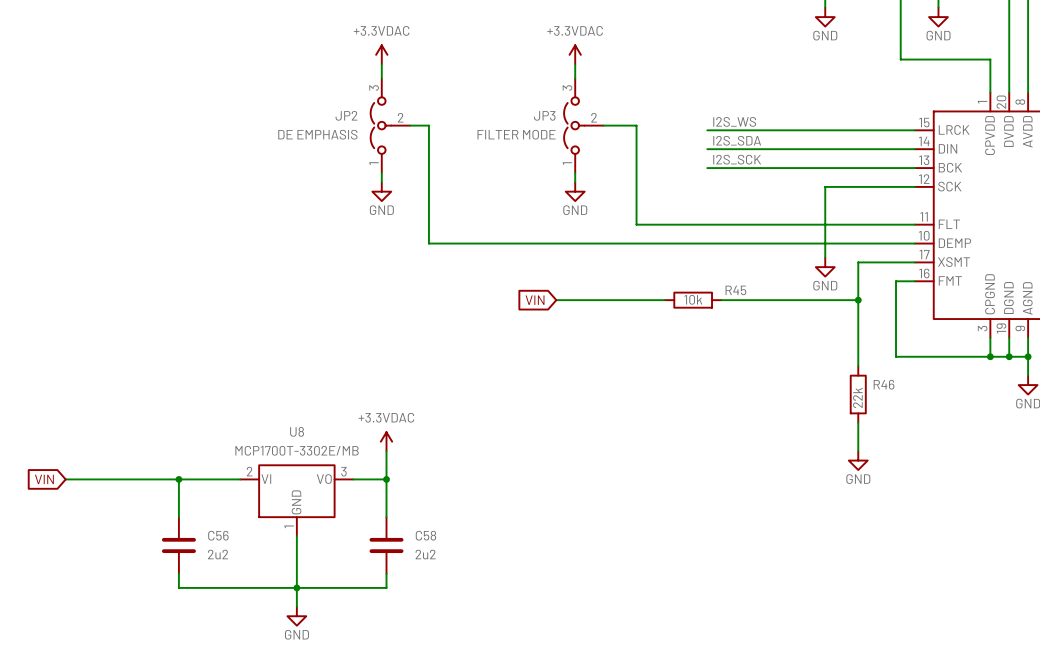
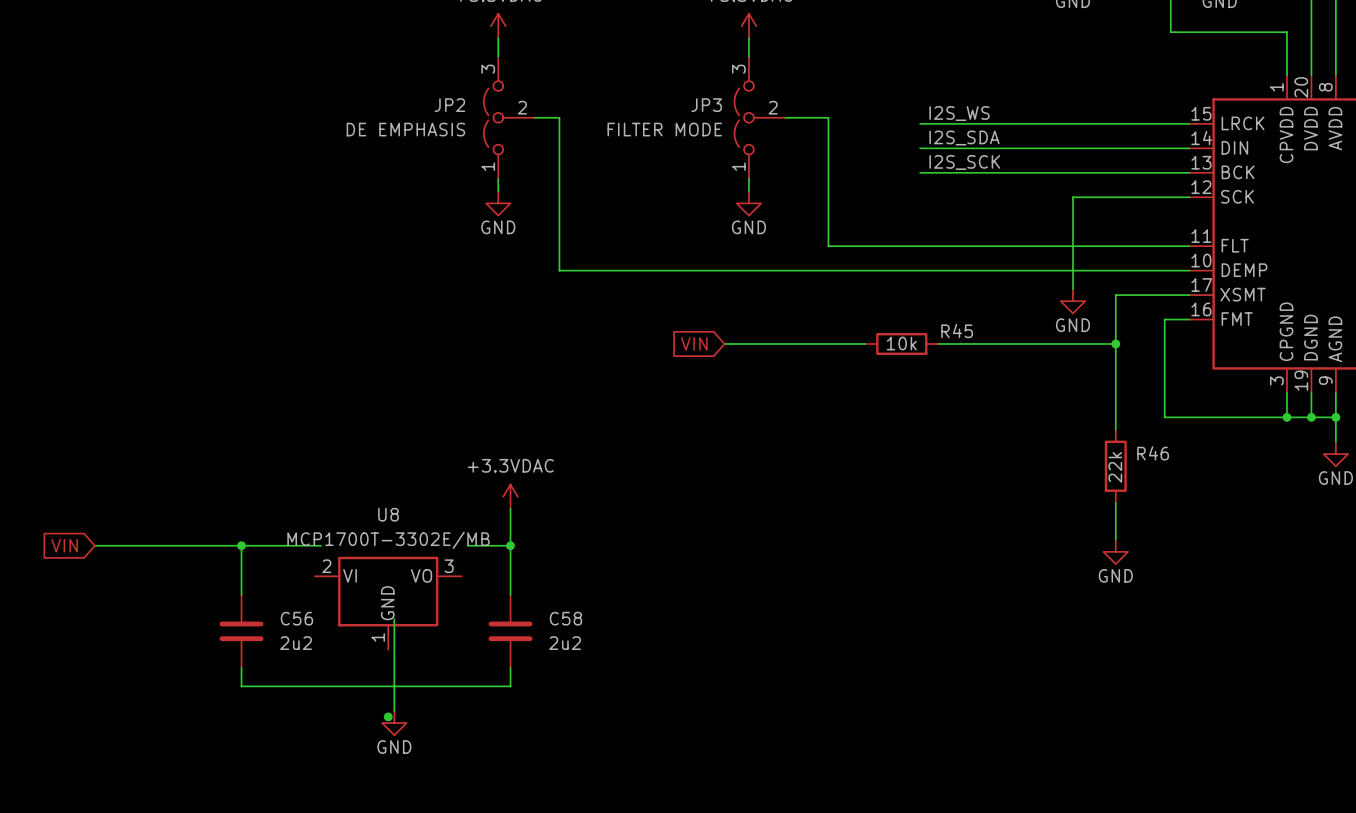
power symbol position: +3.3VDAC (386, 441) -> +3.3VDAC (510, 496)
wire: (386, 451) (386, 517) -> (510, 509) (510, 594)
global label position: VIN (44, 479) -> VIN (64, 545)
wire: (65, 479) (240, 479) -> (94, 545) (320, 545)
wire: (178, 479) (178, 517) -> (241, 545) (241, 594)
junction position: (178, 479) -> (241, 545)
wire: (353, 479) (386, 479) -> (467, 545) (510, 545)
junction position: (386, 479) -> (510, 545)
wire: (296, 536) (296, 606) -> (394, 619) (394, 710)
C56 position: (178, 545) -> (241, 631)
C58 position: (386, 545) -> (510, 631)
wire: (178, 573) (178, 587) (386, 587) (386, 573) -> (241, 668) (241, 686) (510, 686) (510, 668)
power symbol position: GND (296, 616) -> GND (394, 723)

